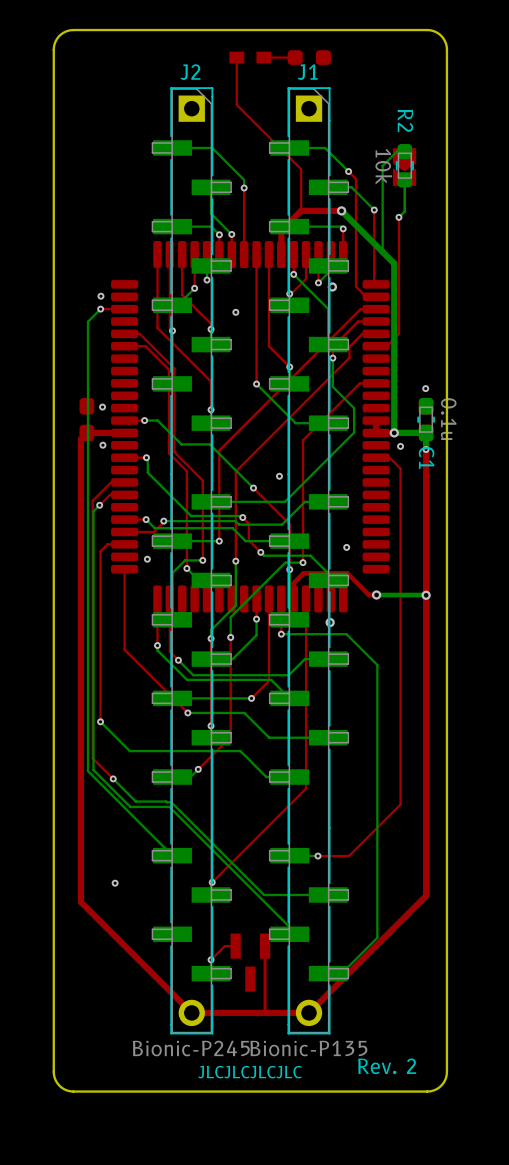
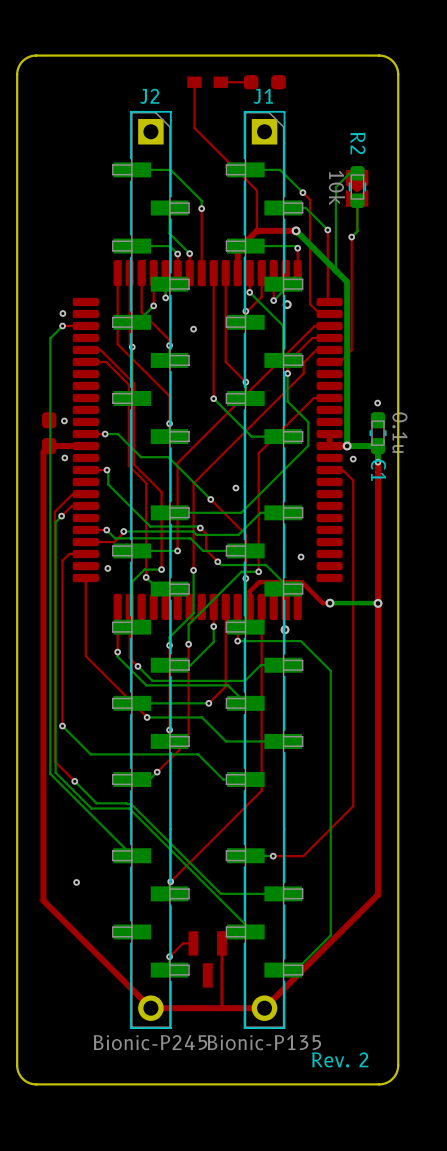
text: JLCJLCJLCJLC (250, 1072) -> none

